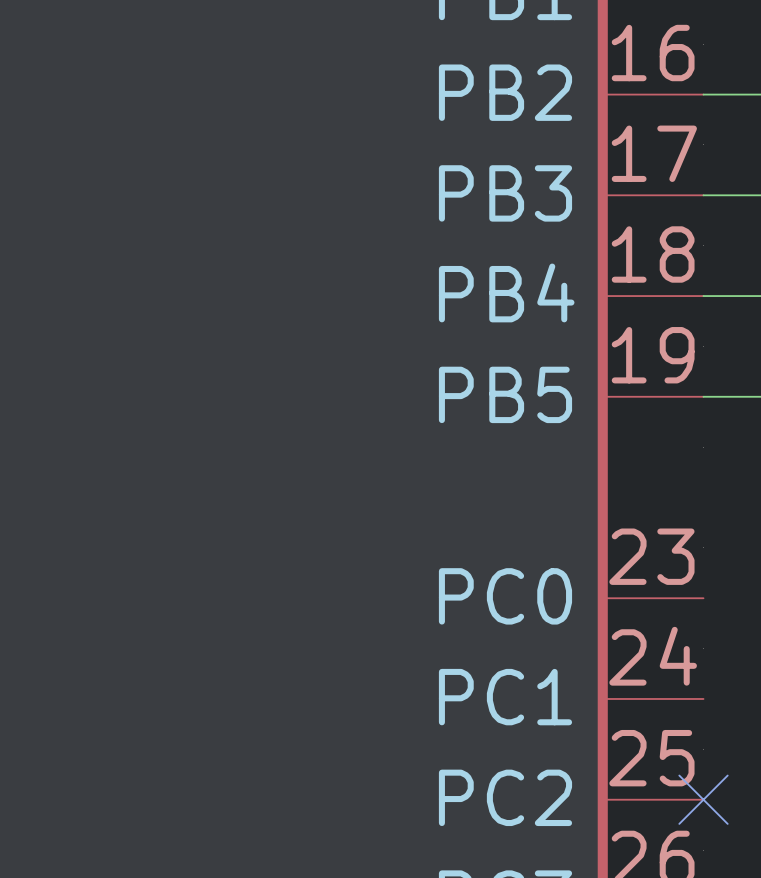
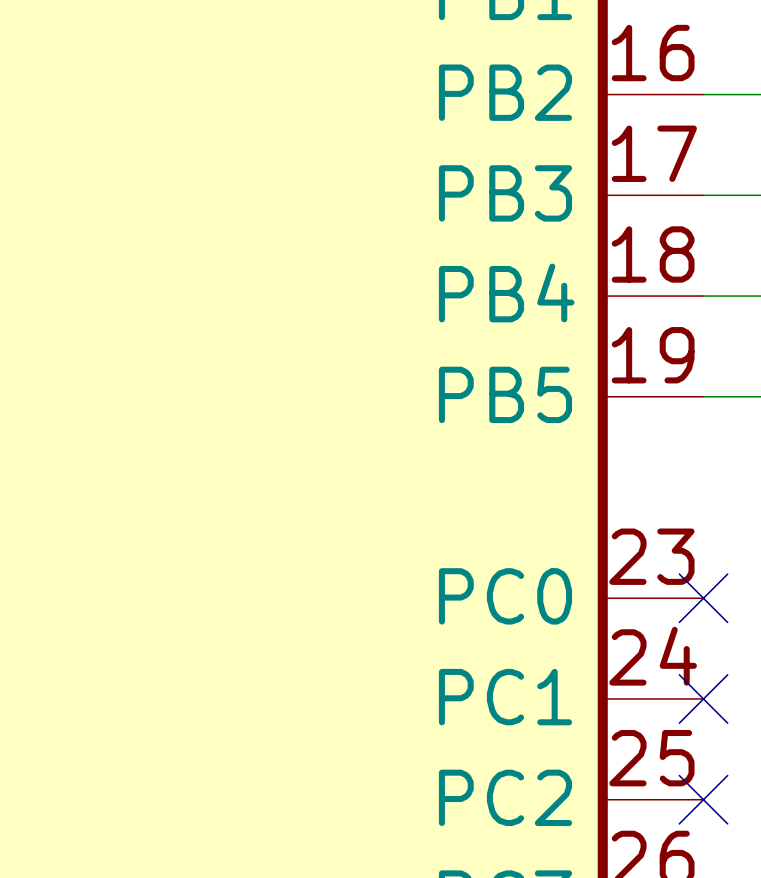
no-connect mark: none -> (703, 598)
no-connect mark: none -> (703, 698)

